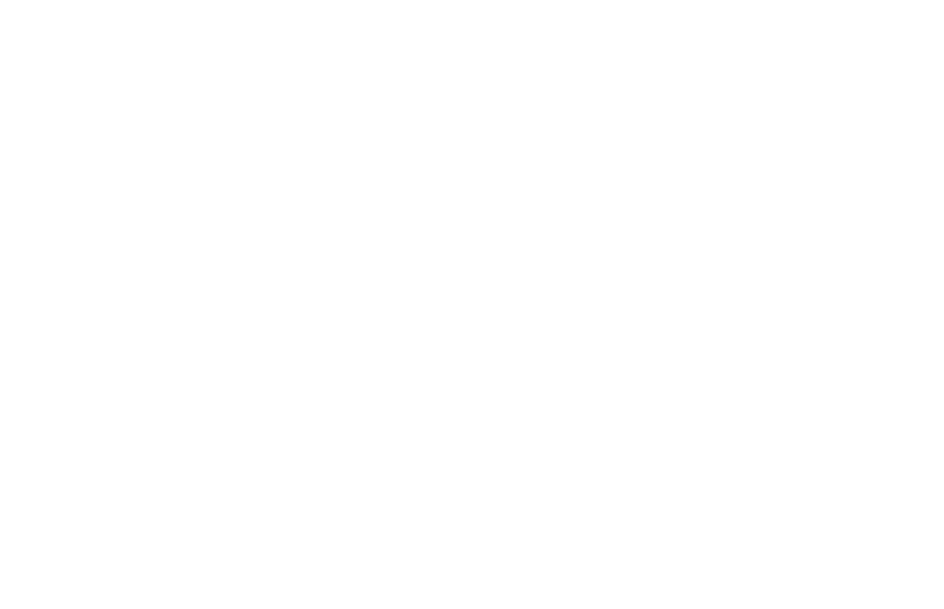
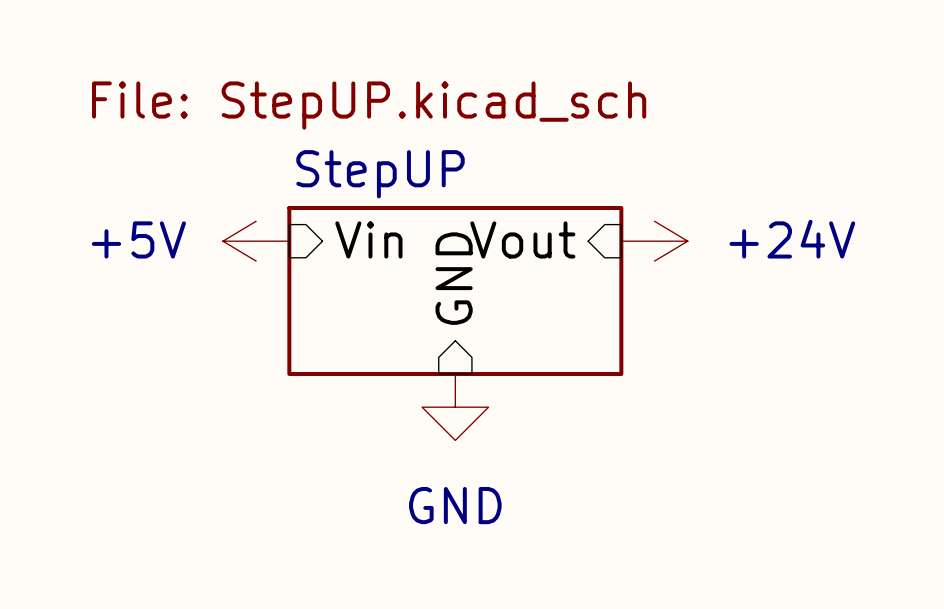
sheet pin: none -> Vin (368, 239)
sheet pin: none -> Vout (522, 239)
power symbol: none -> +5V (256, 241)
power symbol: none -> +24V (654, 241)
sheet pin: none -> GND (454, 278)
sheet StepUP: none -> File: StepUP.kicad_sch (455, 290)
power symbol: none -> GND (455, 407)

